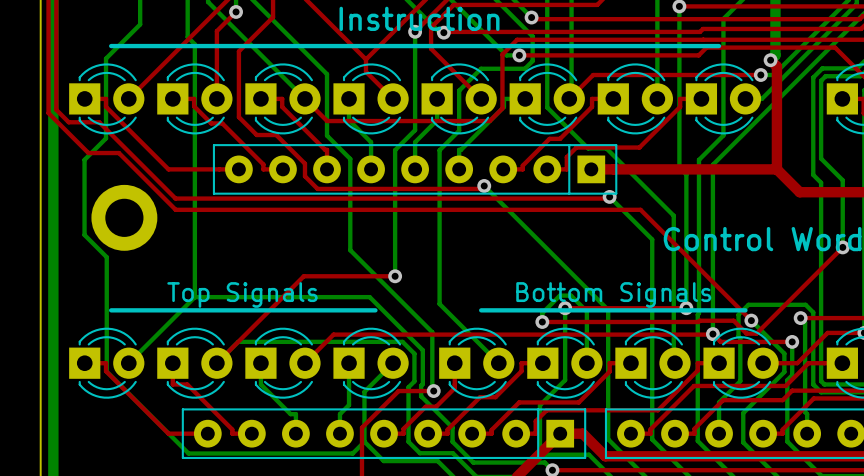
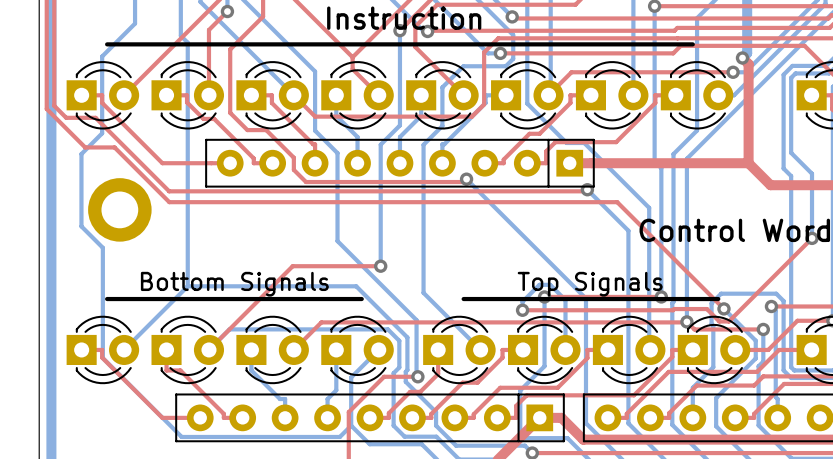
text: Top Signals (242, 294) -> Bottom Signals (234, 284)
text: Bottom Signals (613, 294) -> Top Signals (590, 284)

